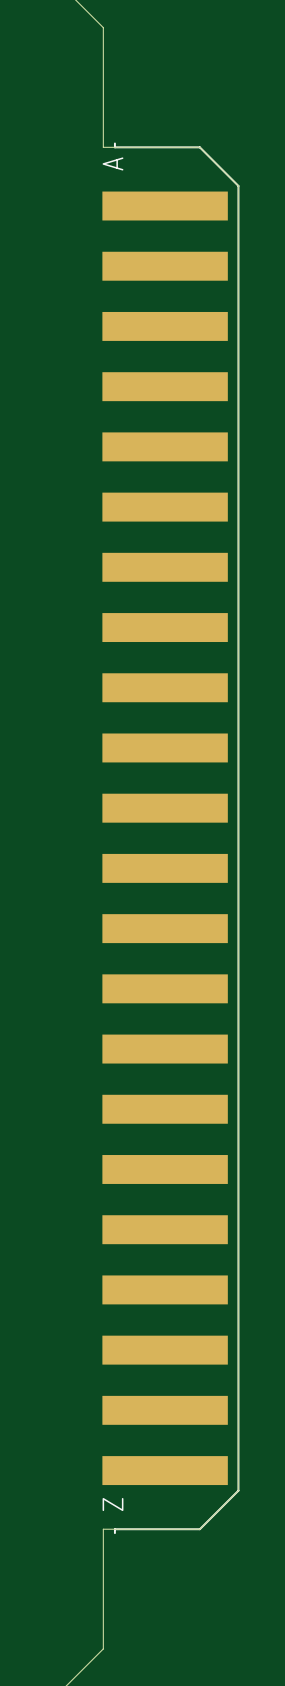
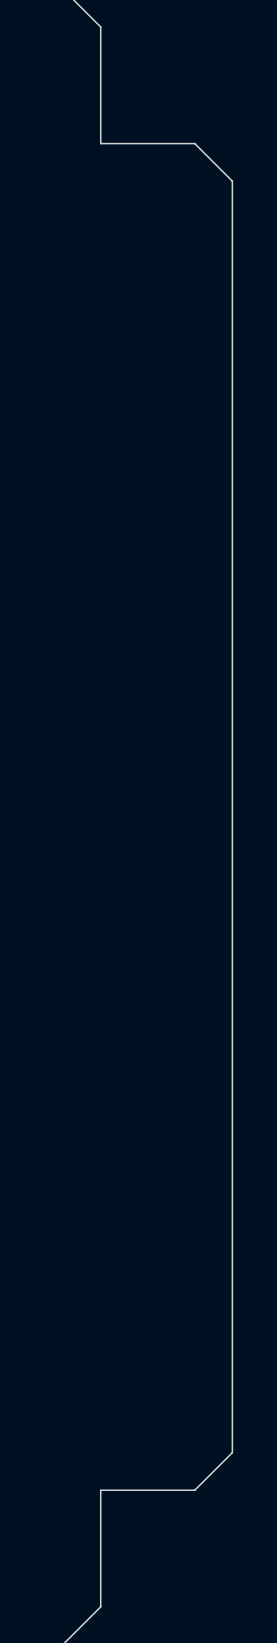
part: (170, 838) -> none

